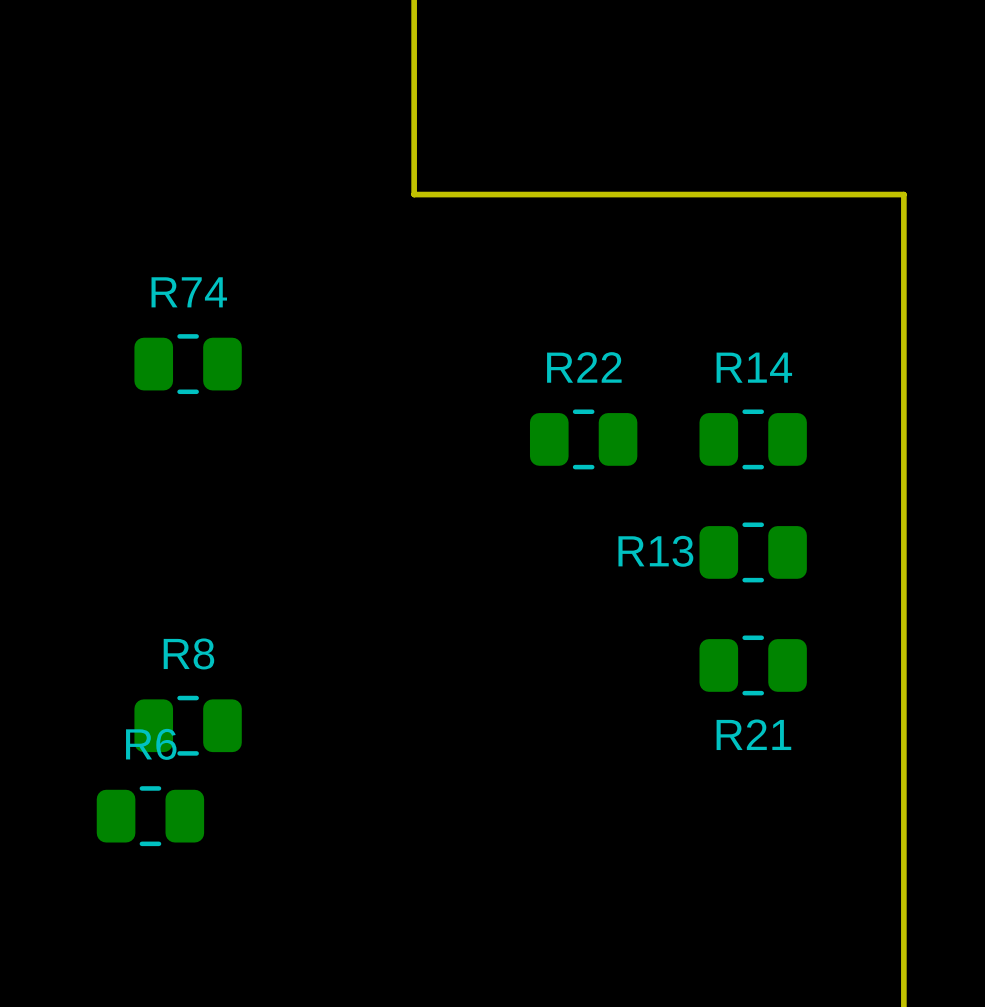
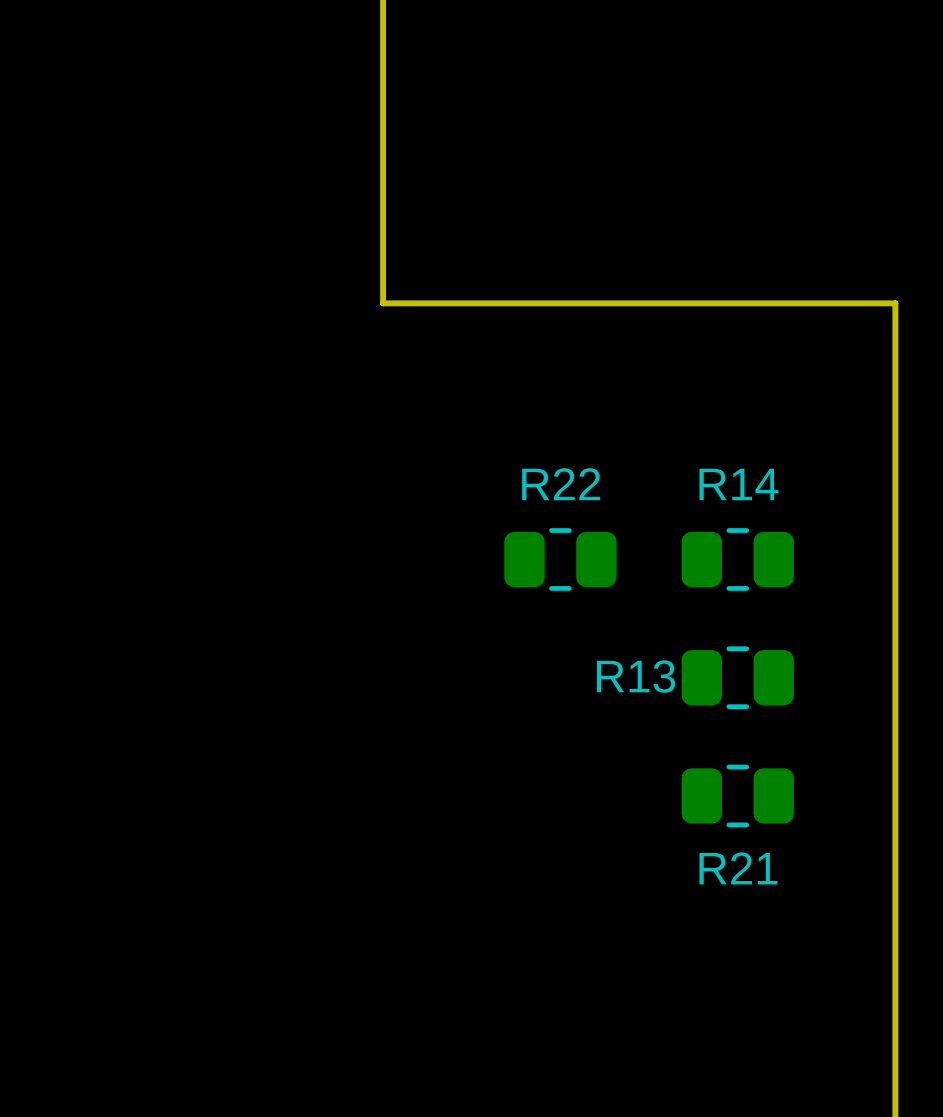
R74: (188, 364) -> none
R8: (188, 725) -> none
R6: (150, 816) -> none

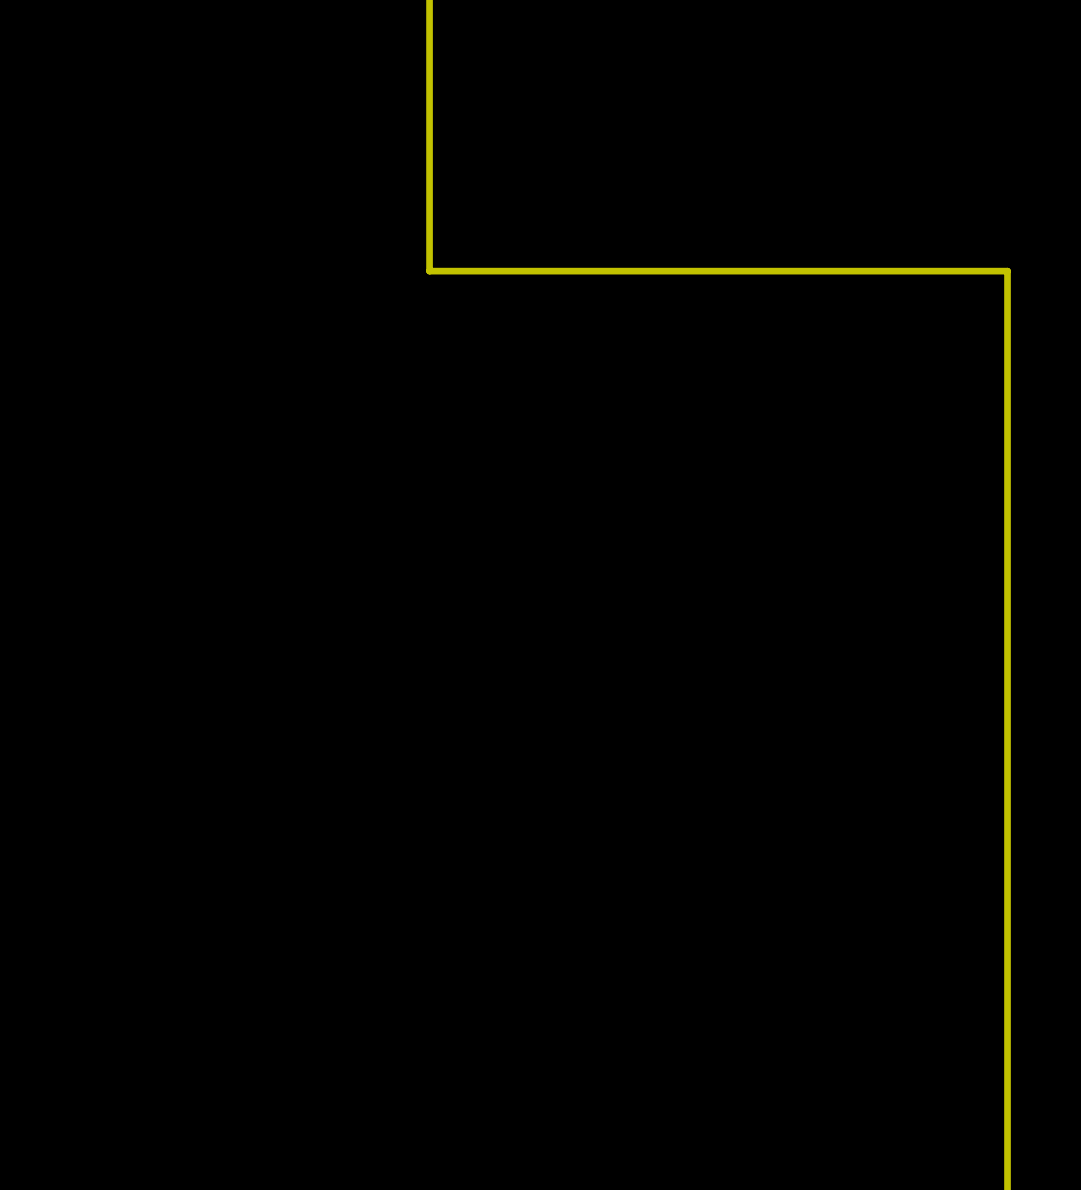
R22: (560, 559) -> none
R14: (737, 559) -> none
R13: (737, 677) -> none
R21: (737, 795) -> none

